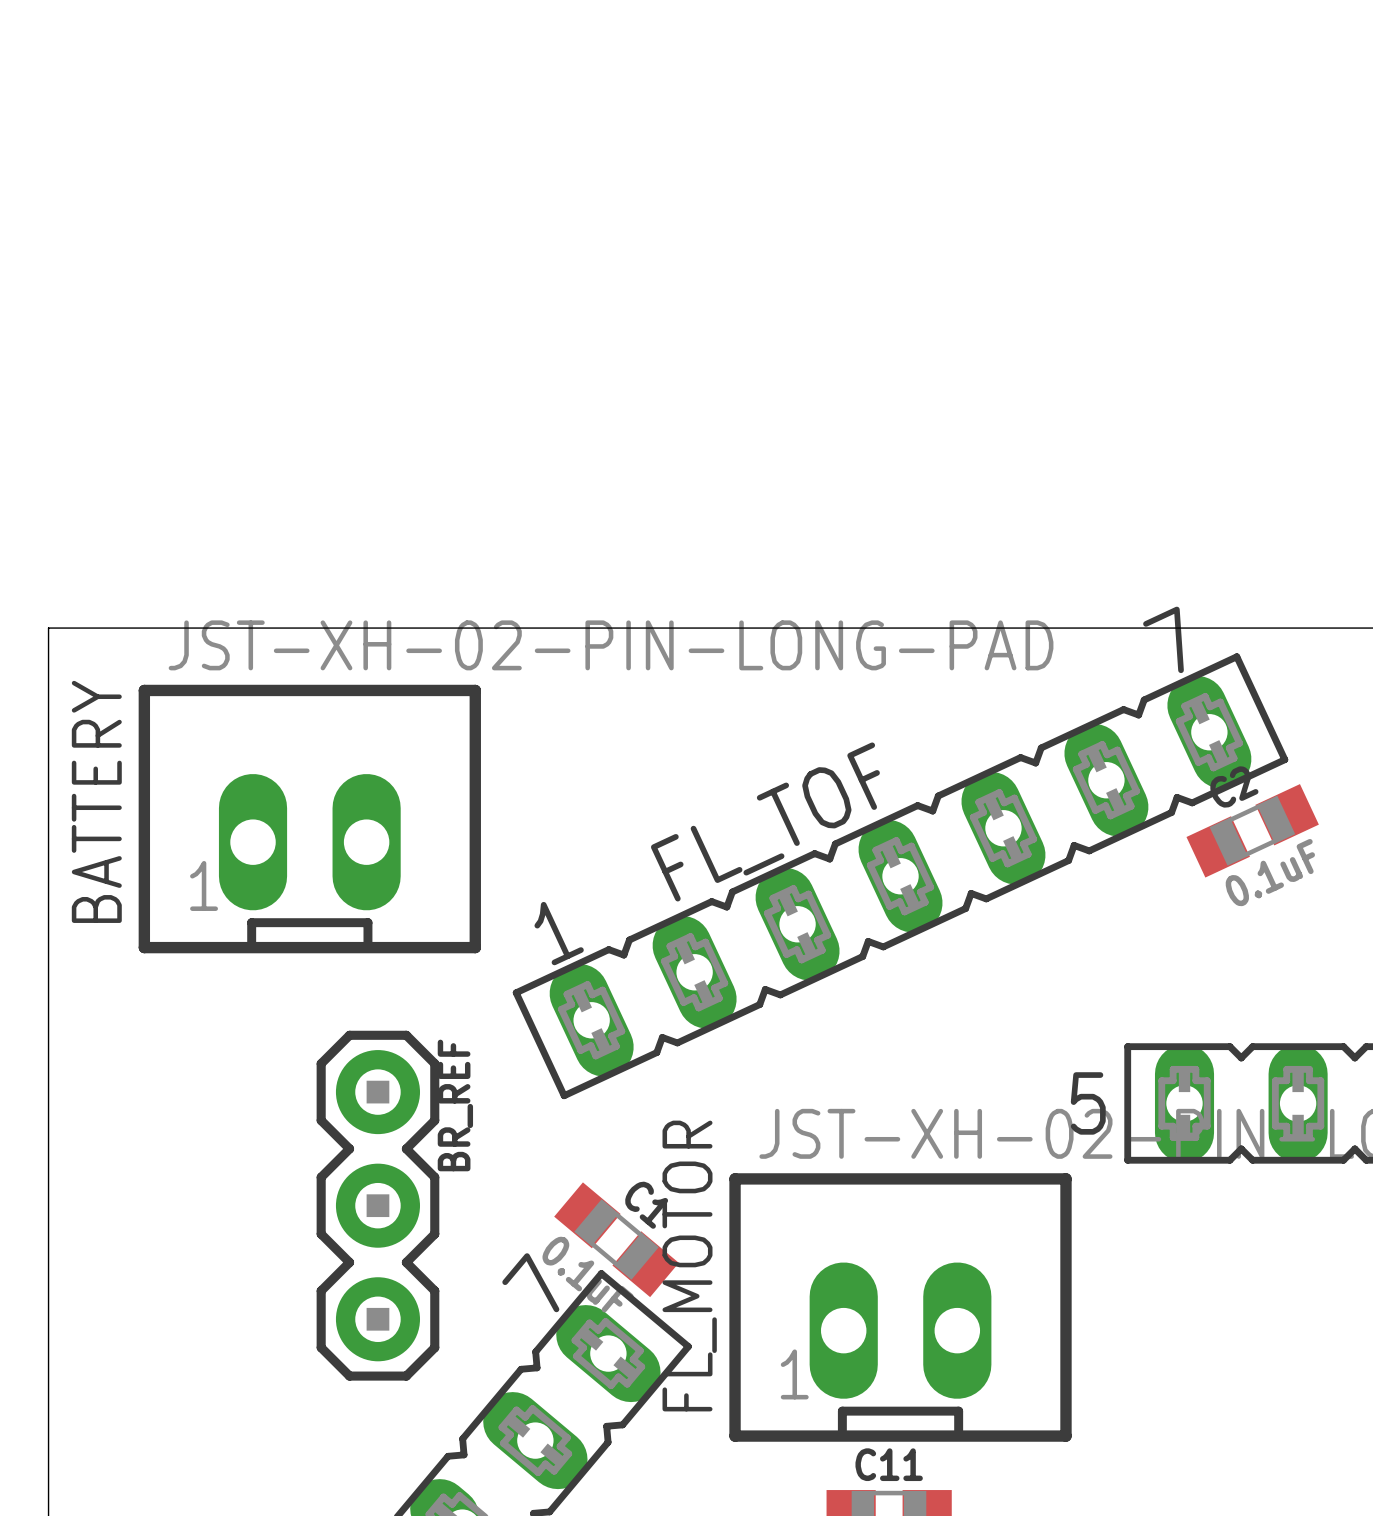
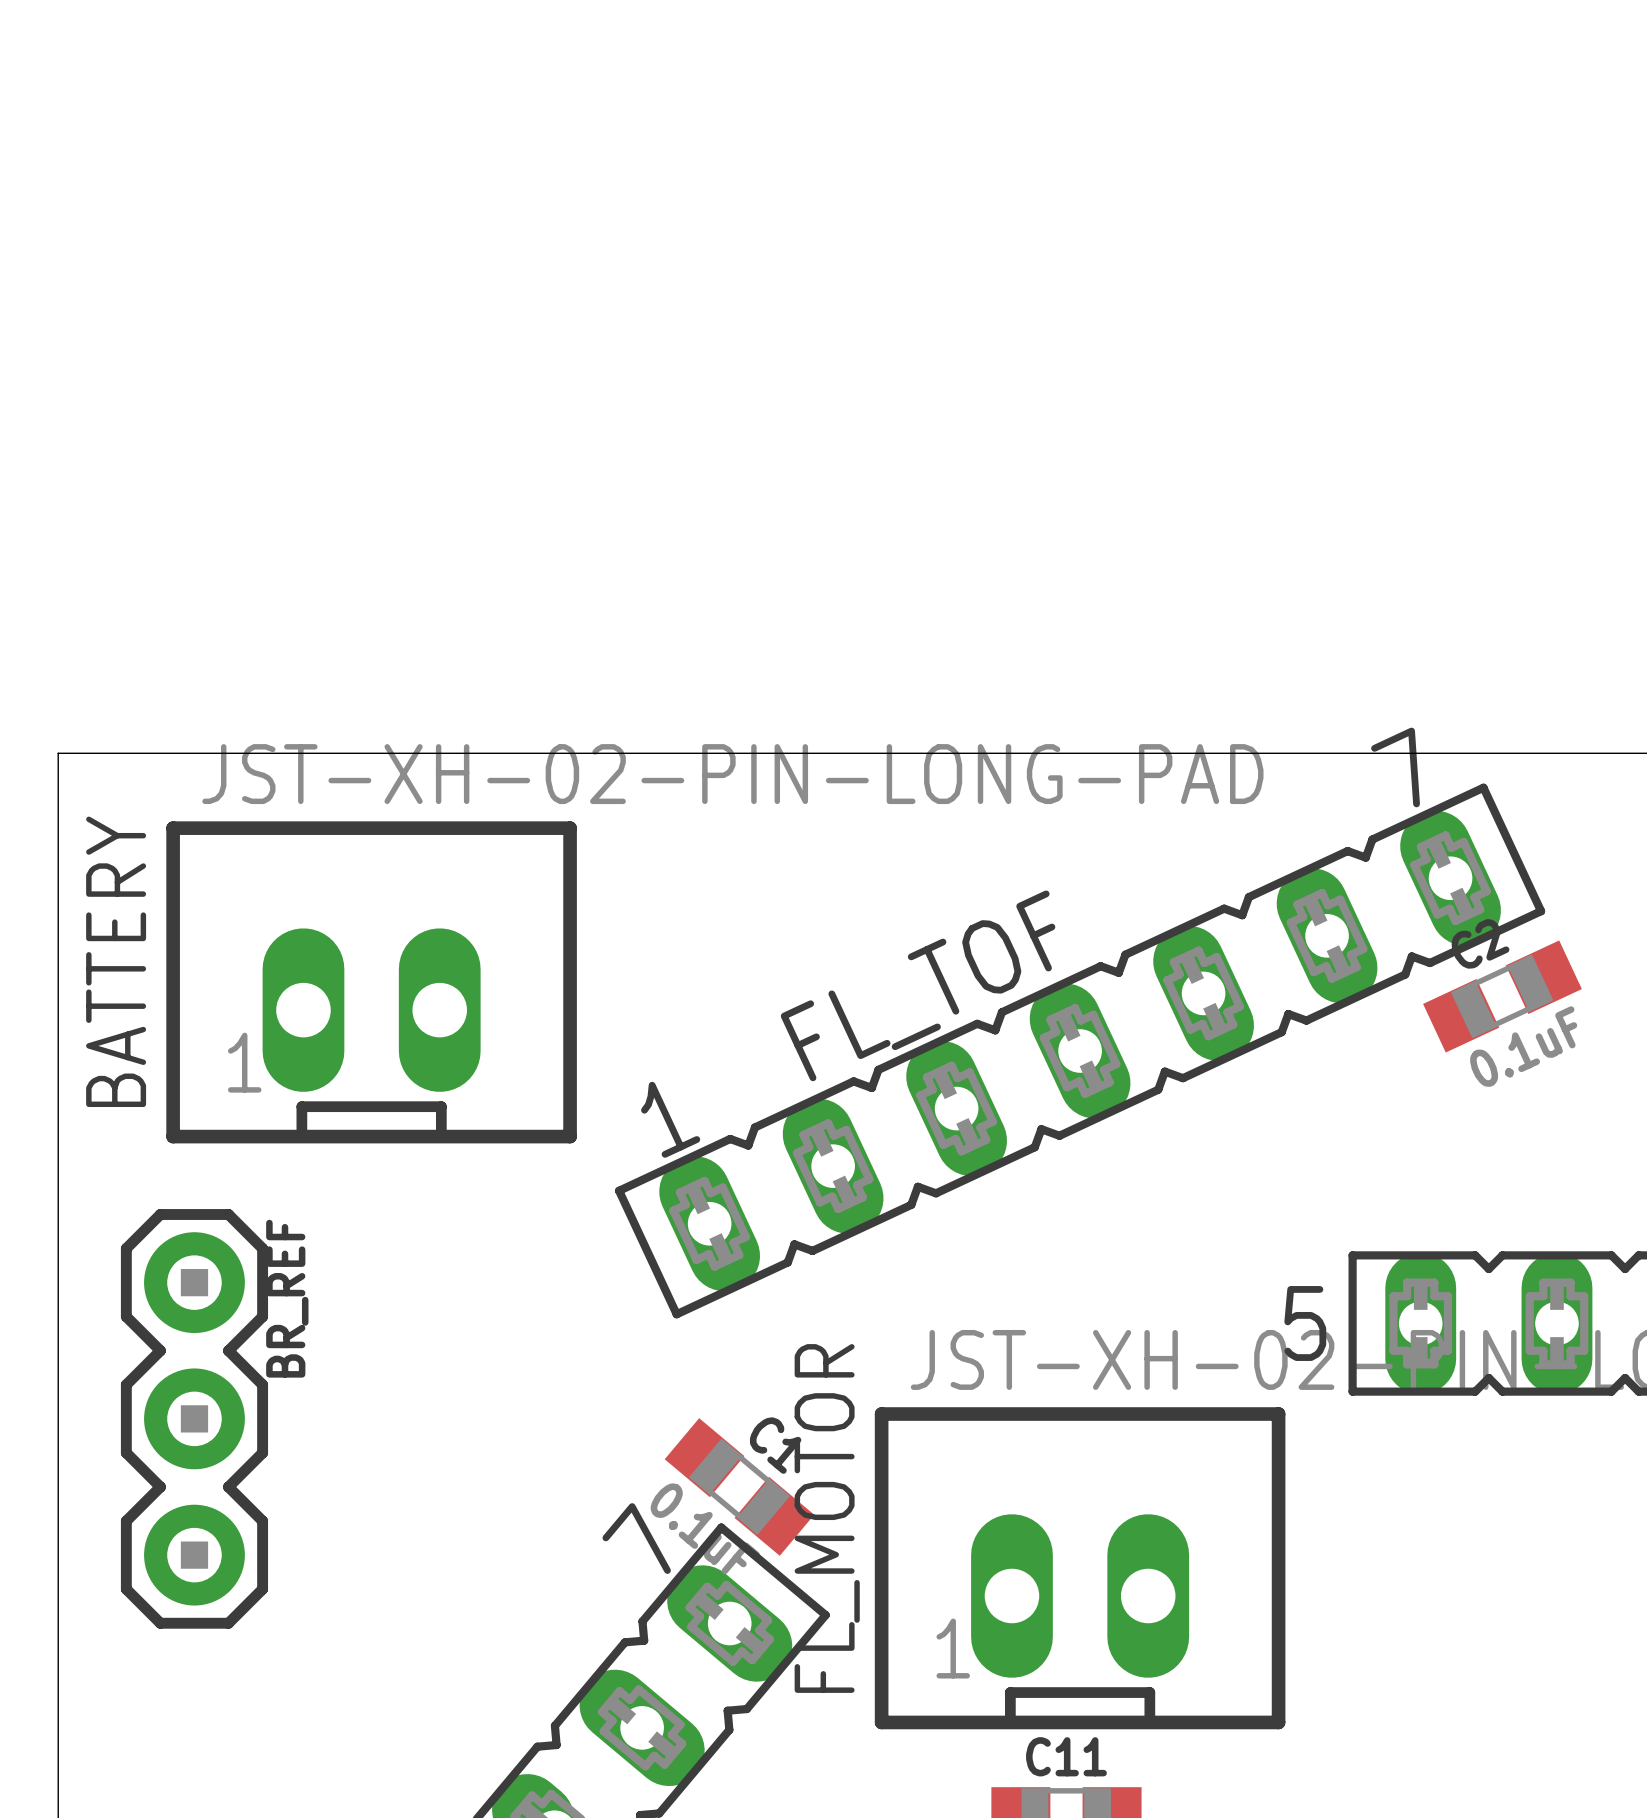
BR_REF position: (377, 1205) -> (194, 1418)

